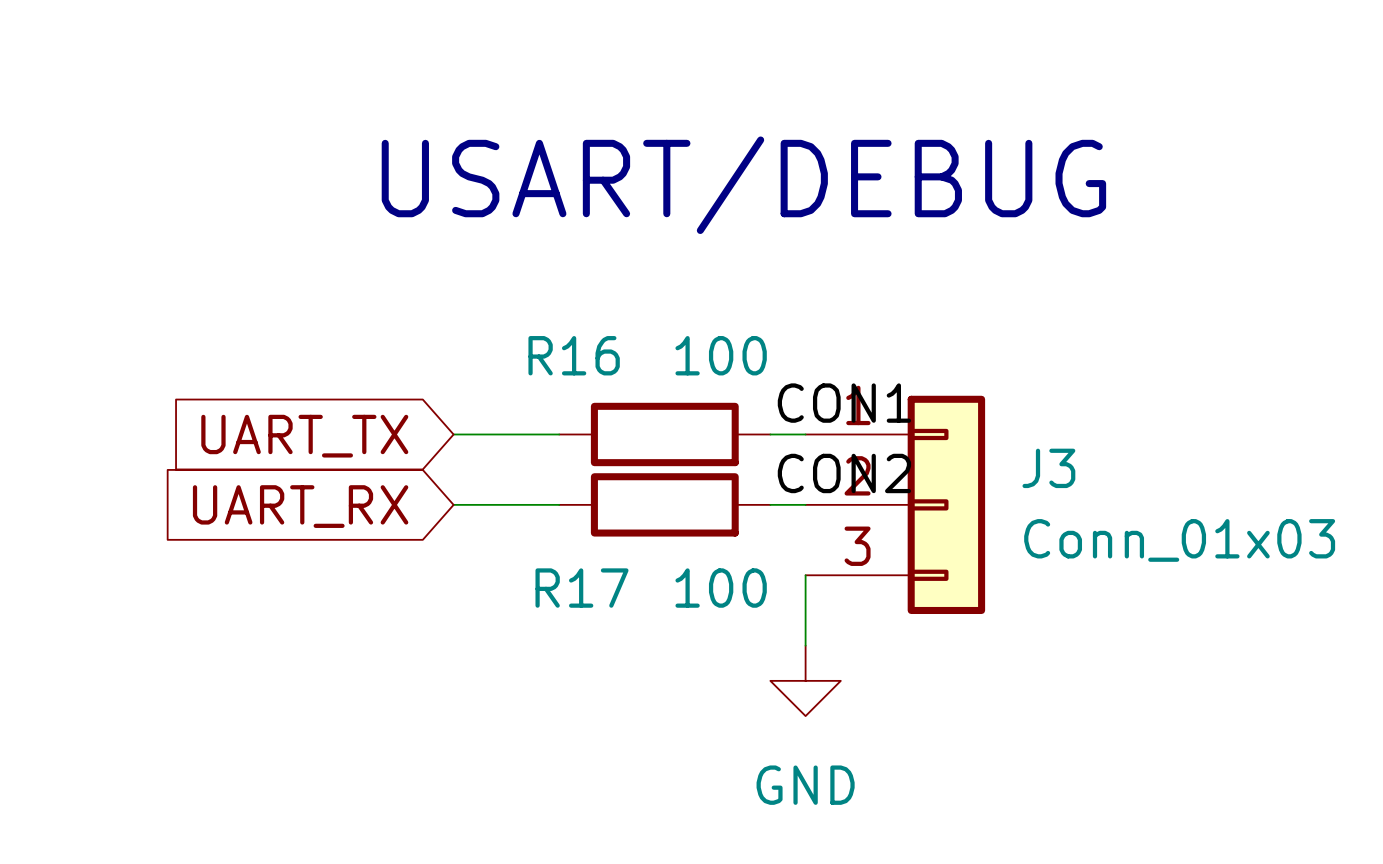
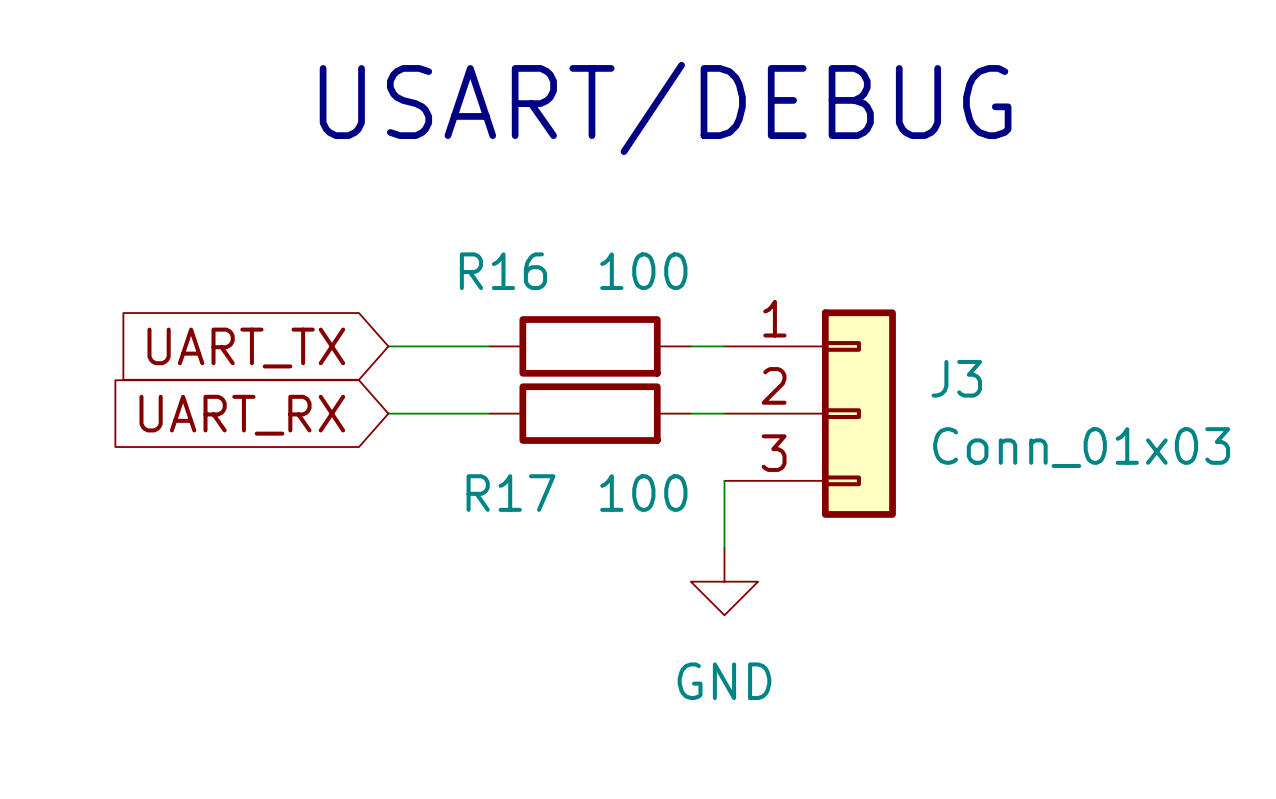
label: CON1 (844, 403) -> none
label: CON2 (844, 473) -> none

